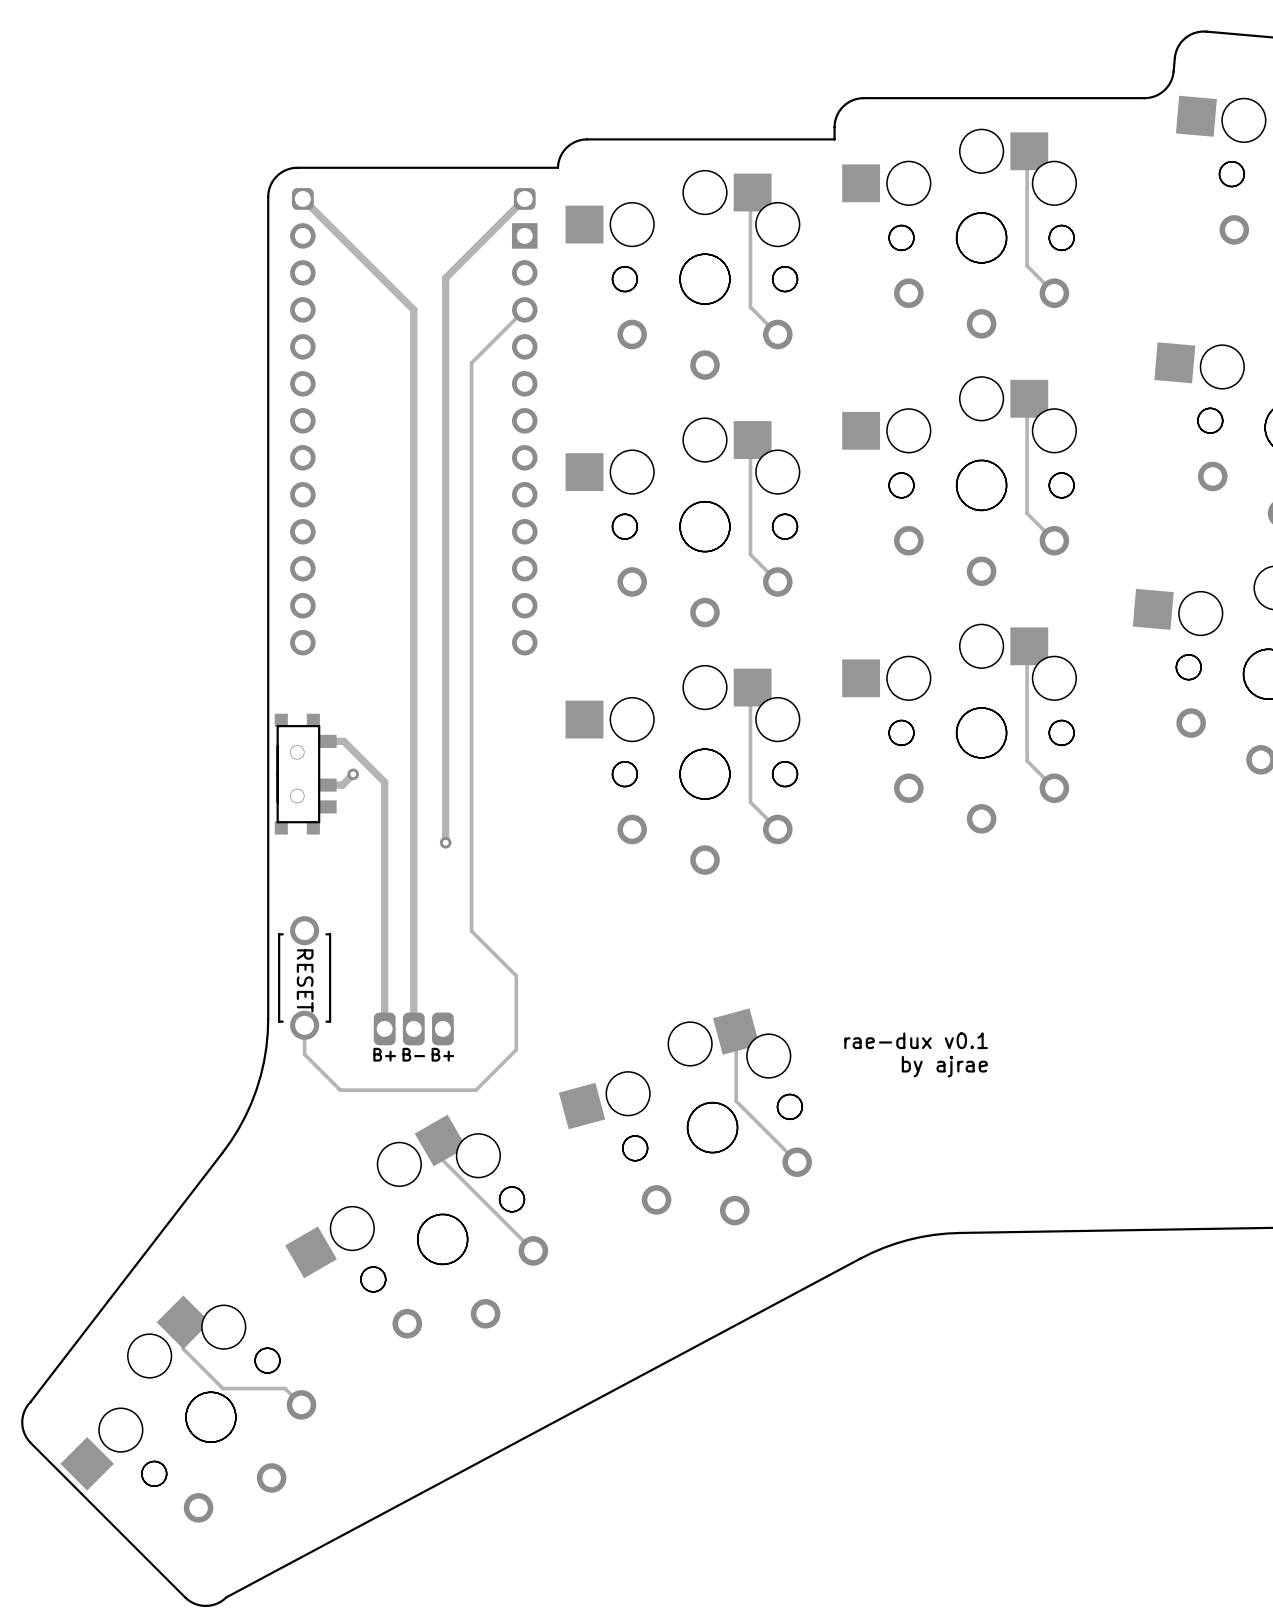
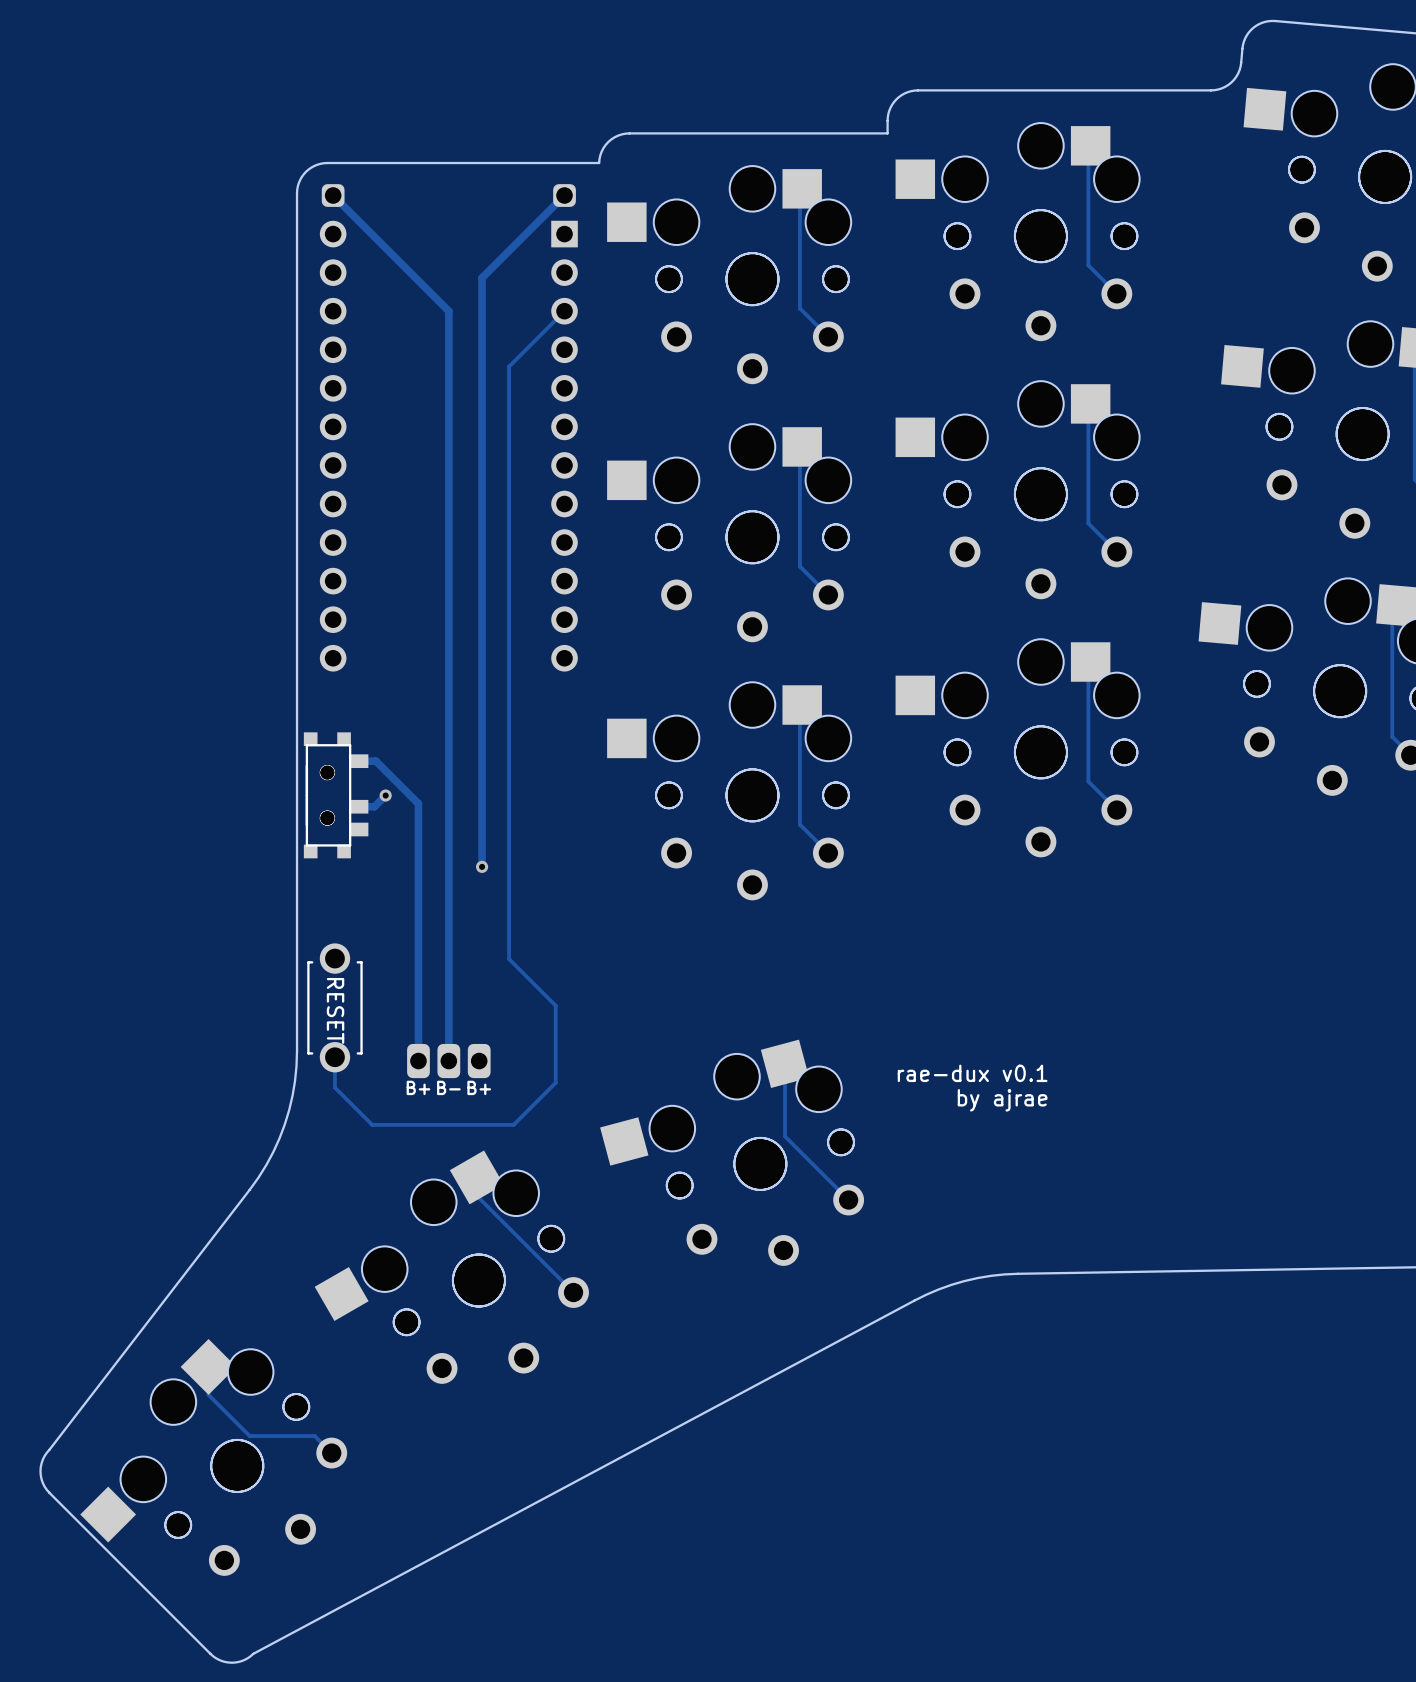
part: none -> (327, 795)

